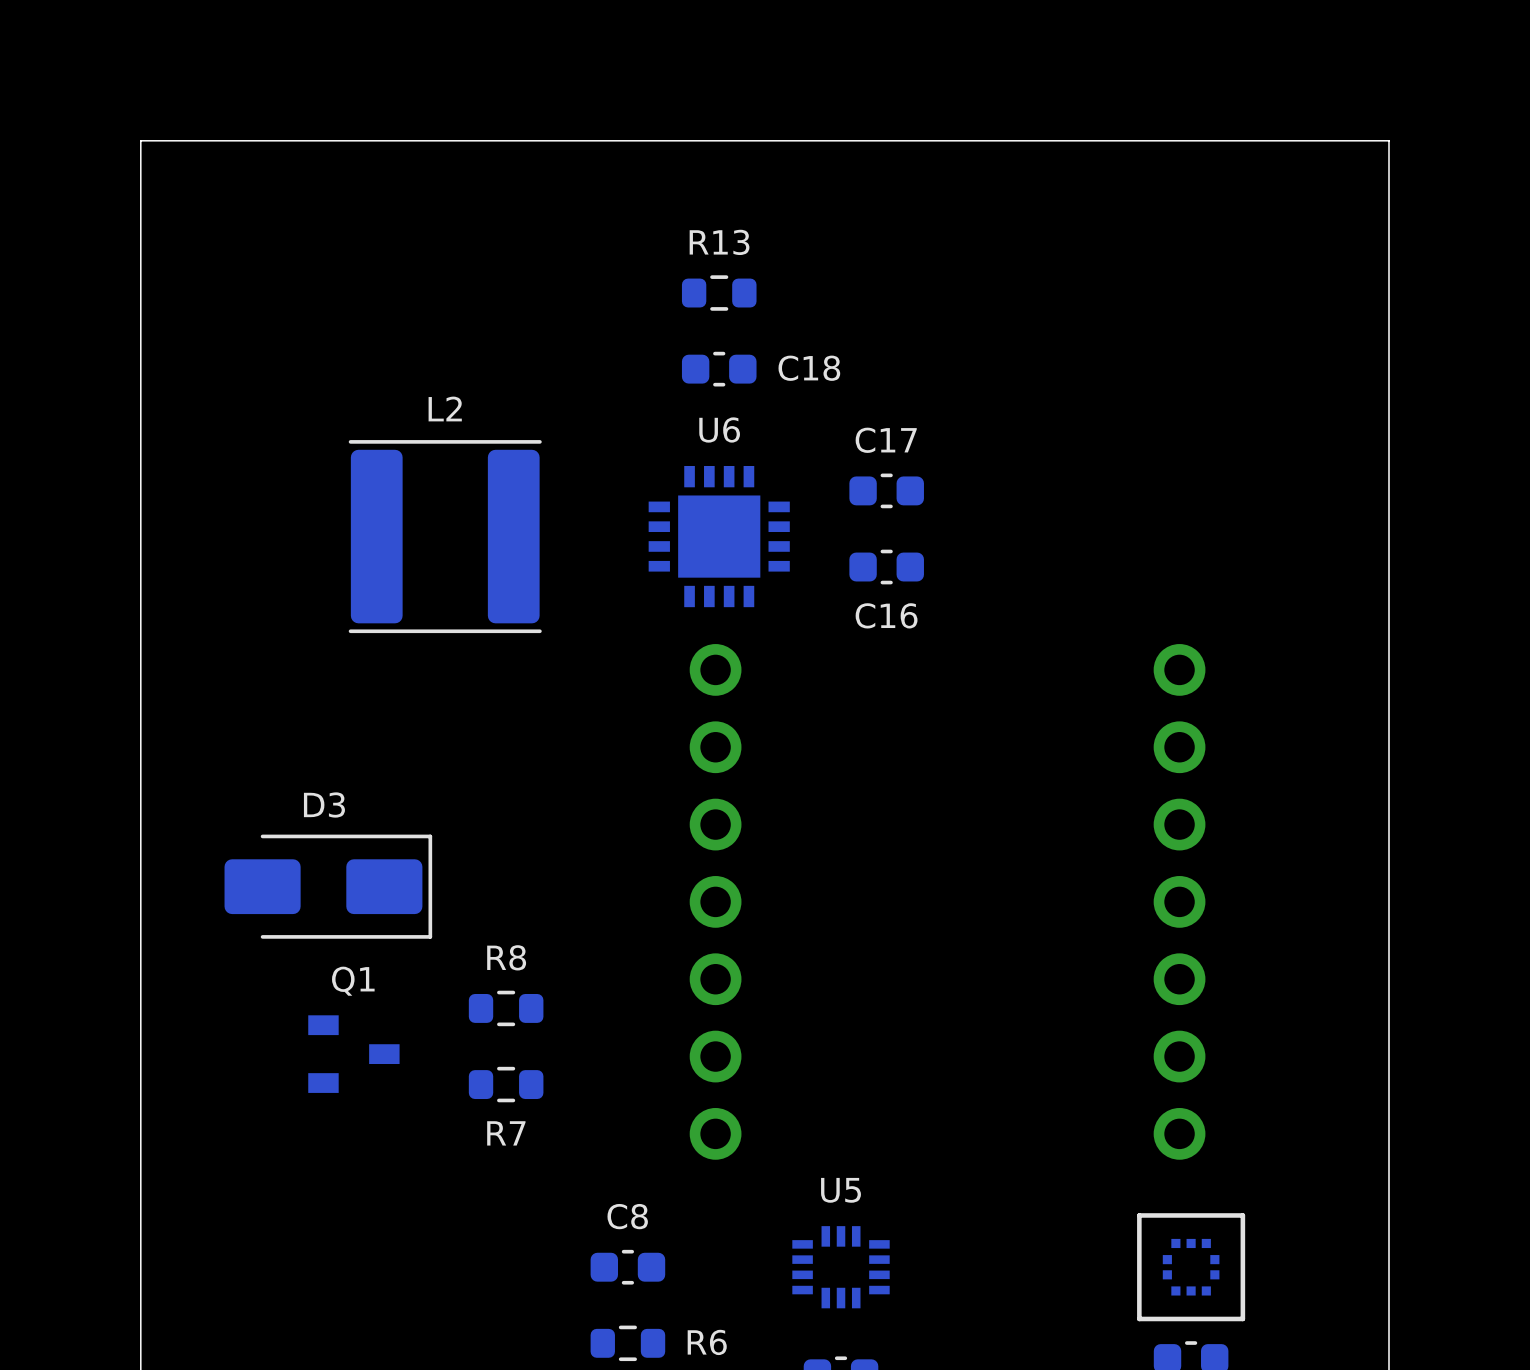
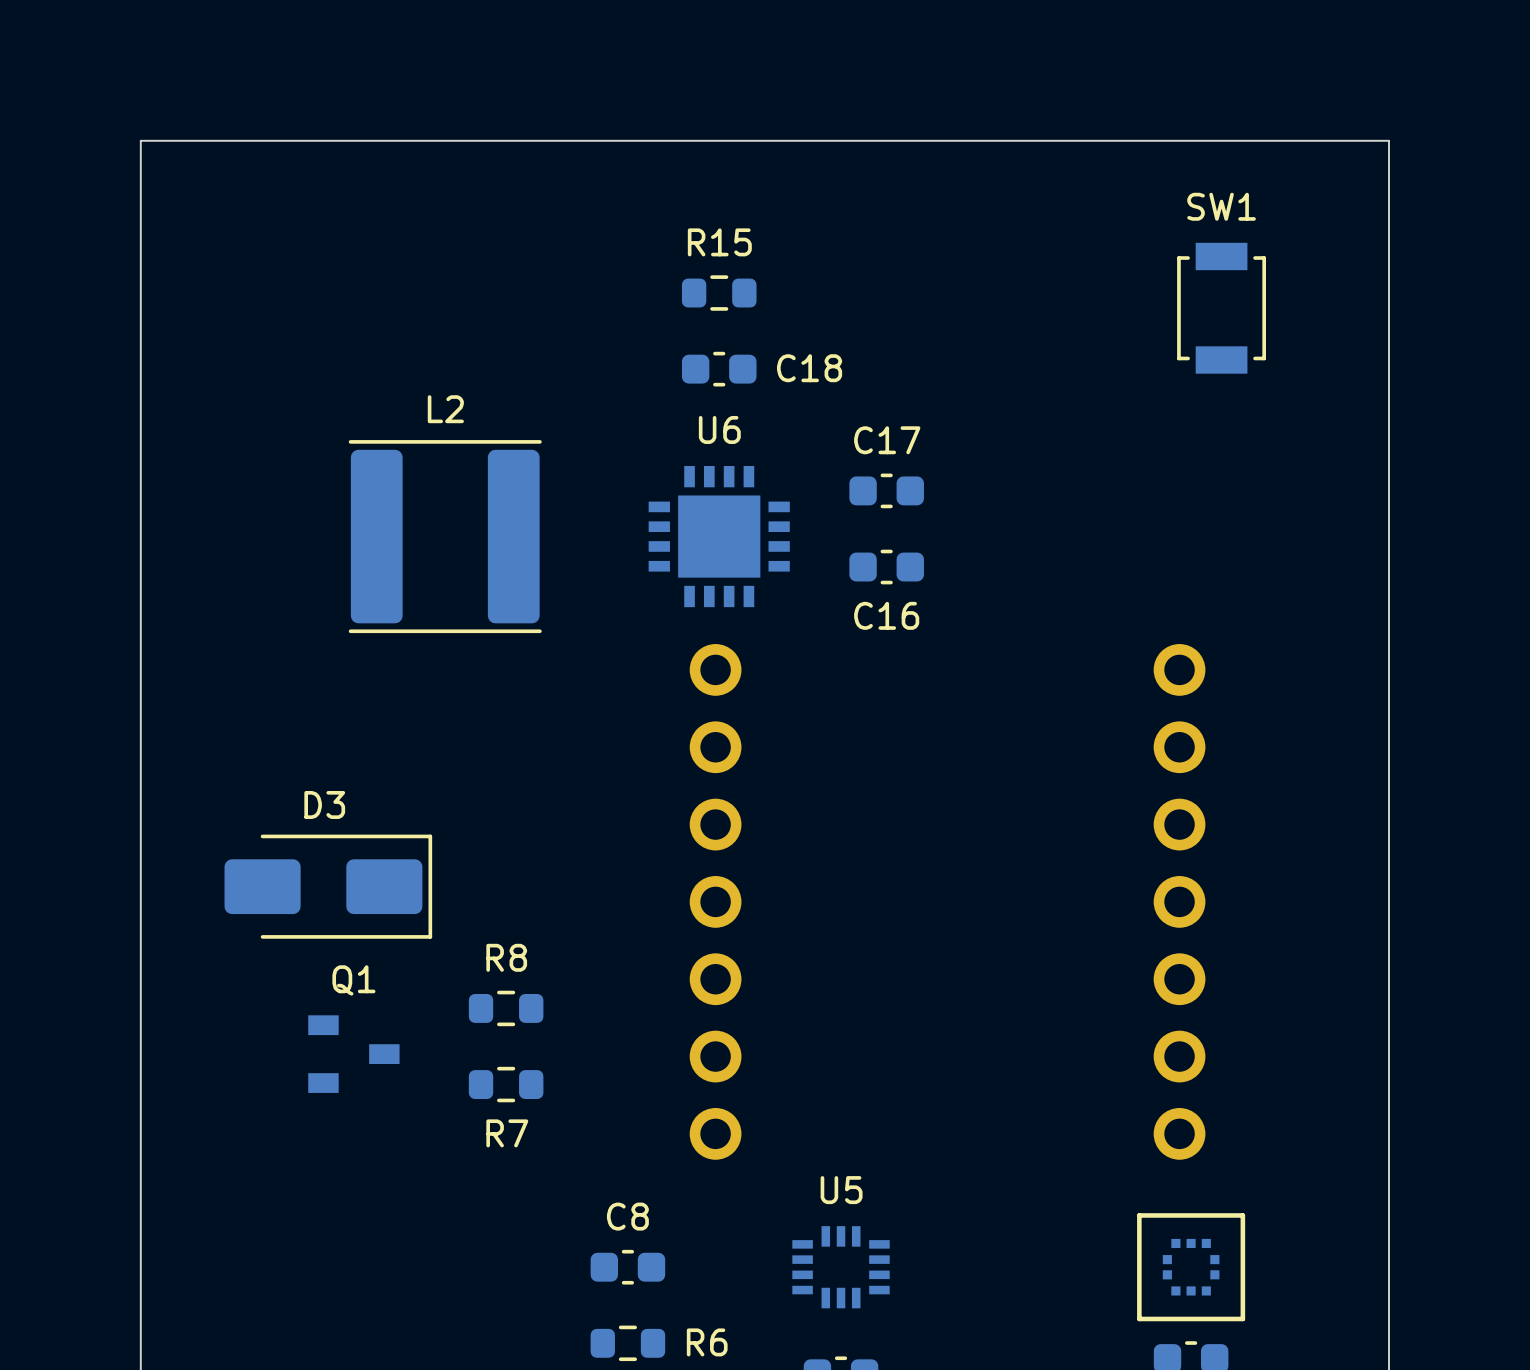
R13 name: R13 (719, 242) -> R15 (719, 242)
SW1: none -> (1221, 308)

